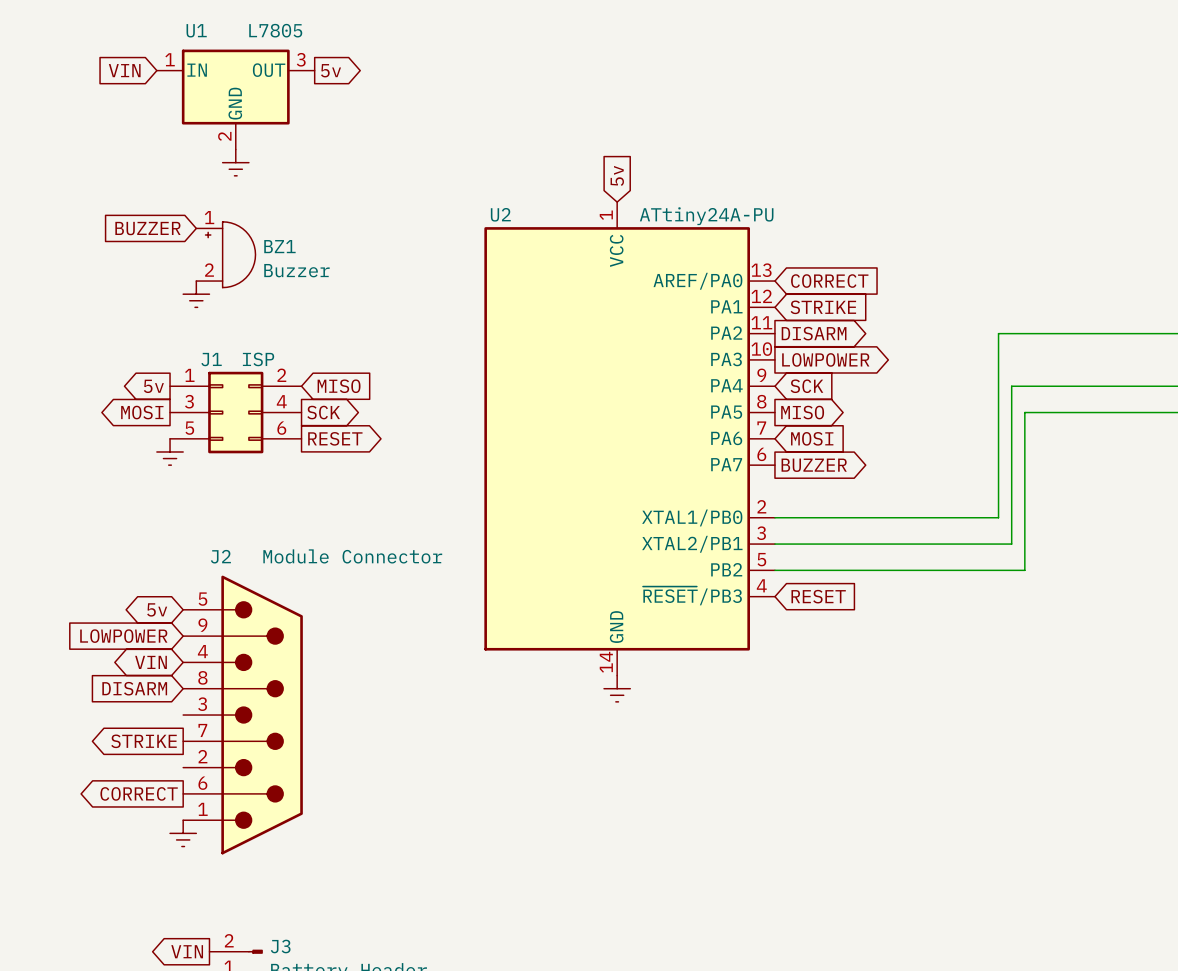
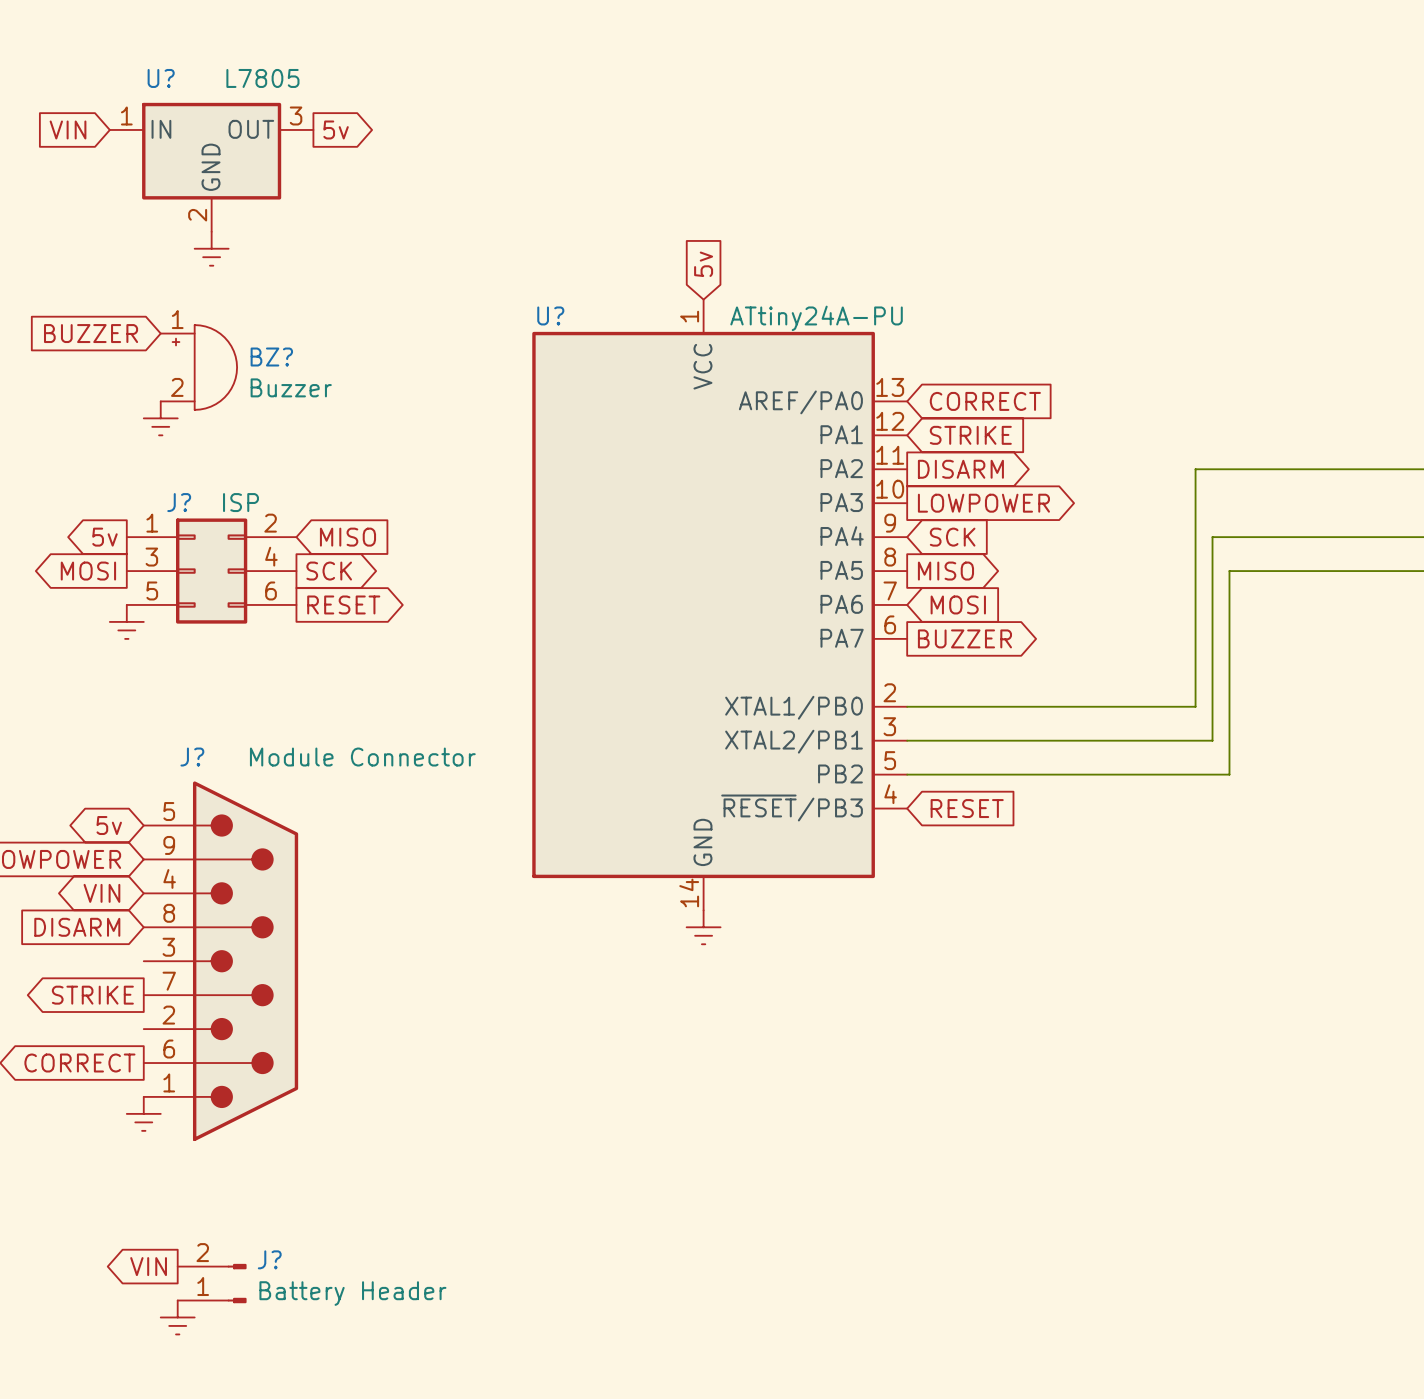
U1 name: U1 (196, 30) -> U? (161, 78)
U2 name: U2 (500, 214) -> U? (550, 315)
BZ1 name: BZ1 (279, 246) -> BZ? (271, 357)
J1 name: J1 (211, 359) -> J? (179, 502)
J2 name: J2 (220, 556) -> J? (192, 757)
J3 name: J3 (280, 946) -> J? (269, 1259)

